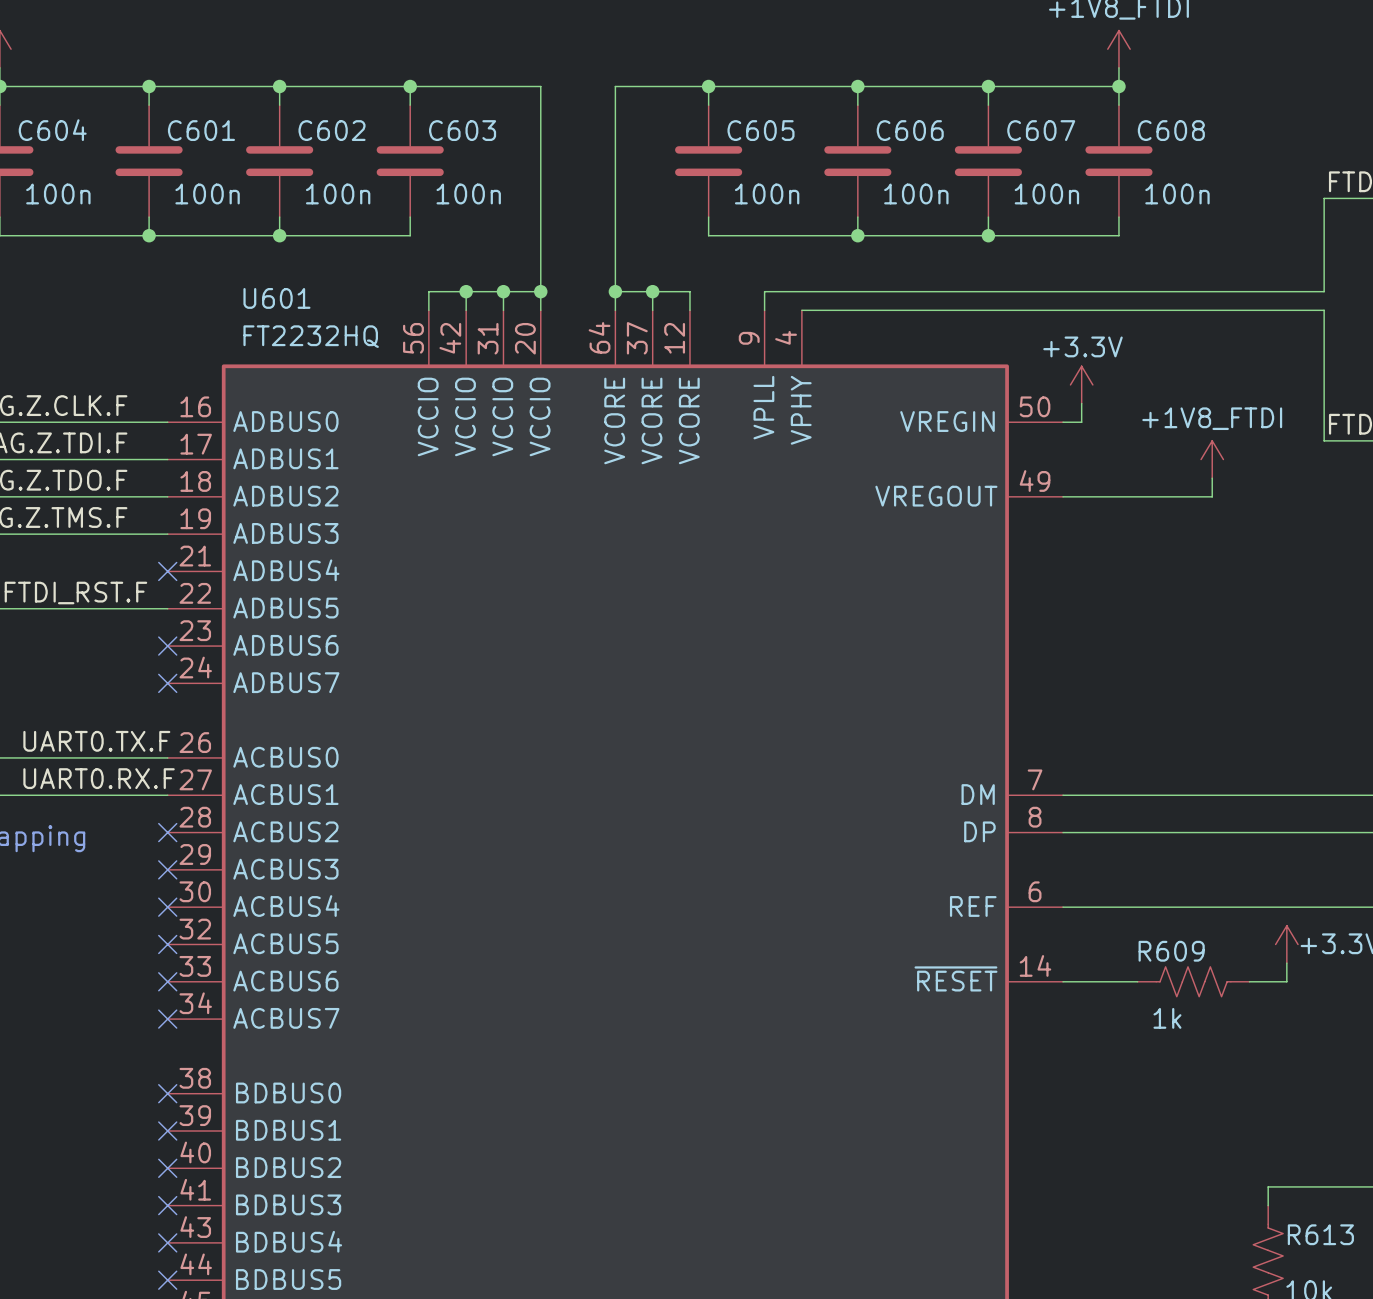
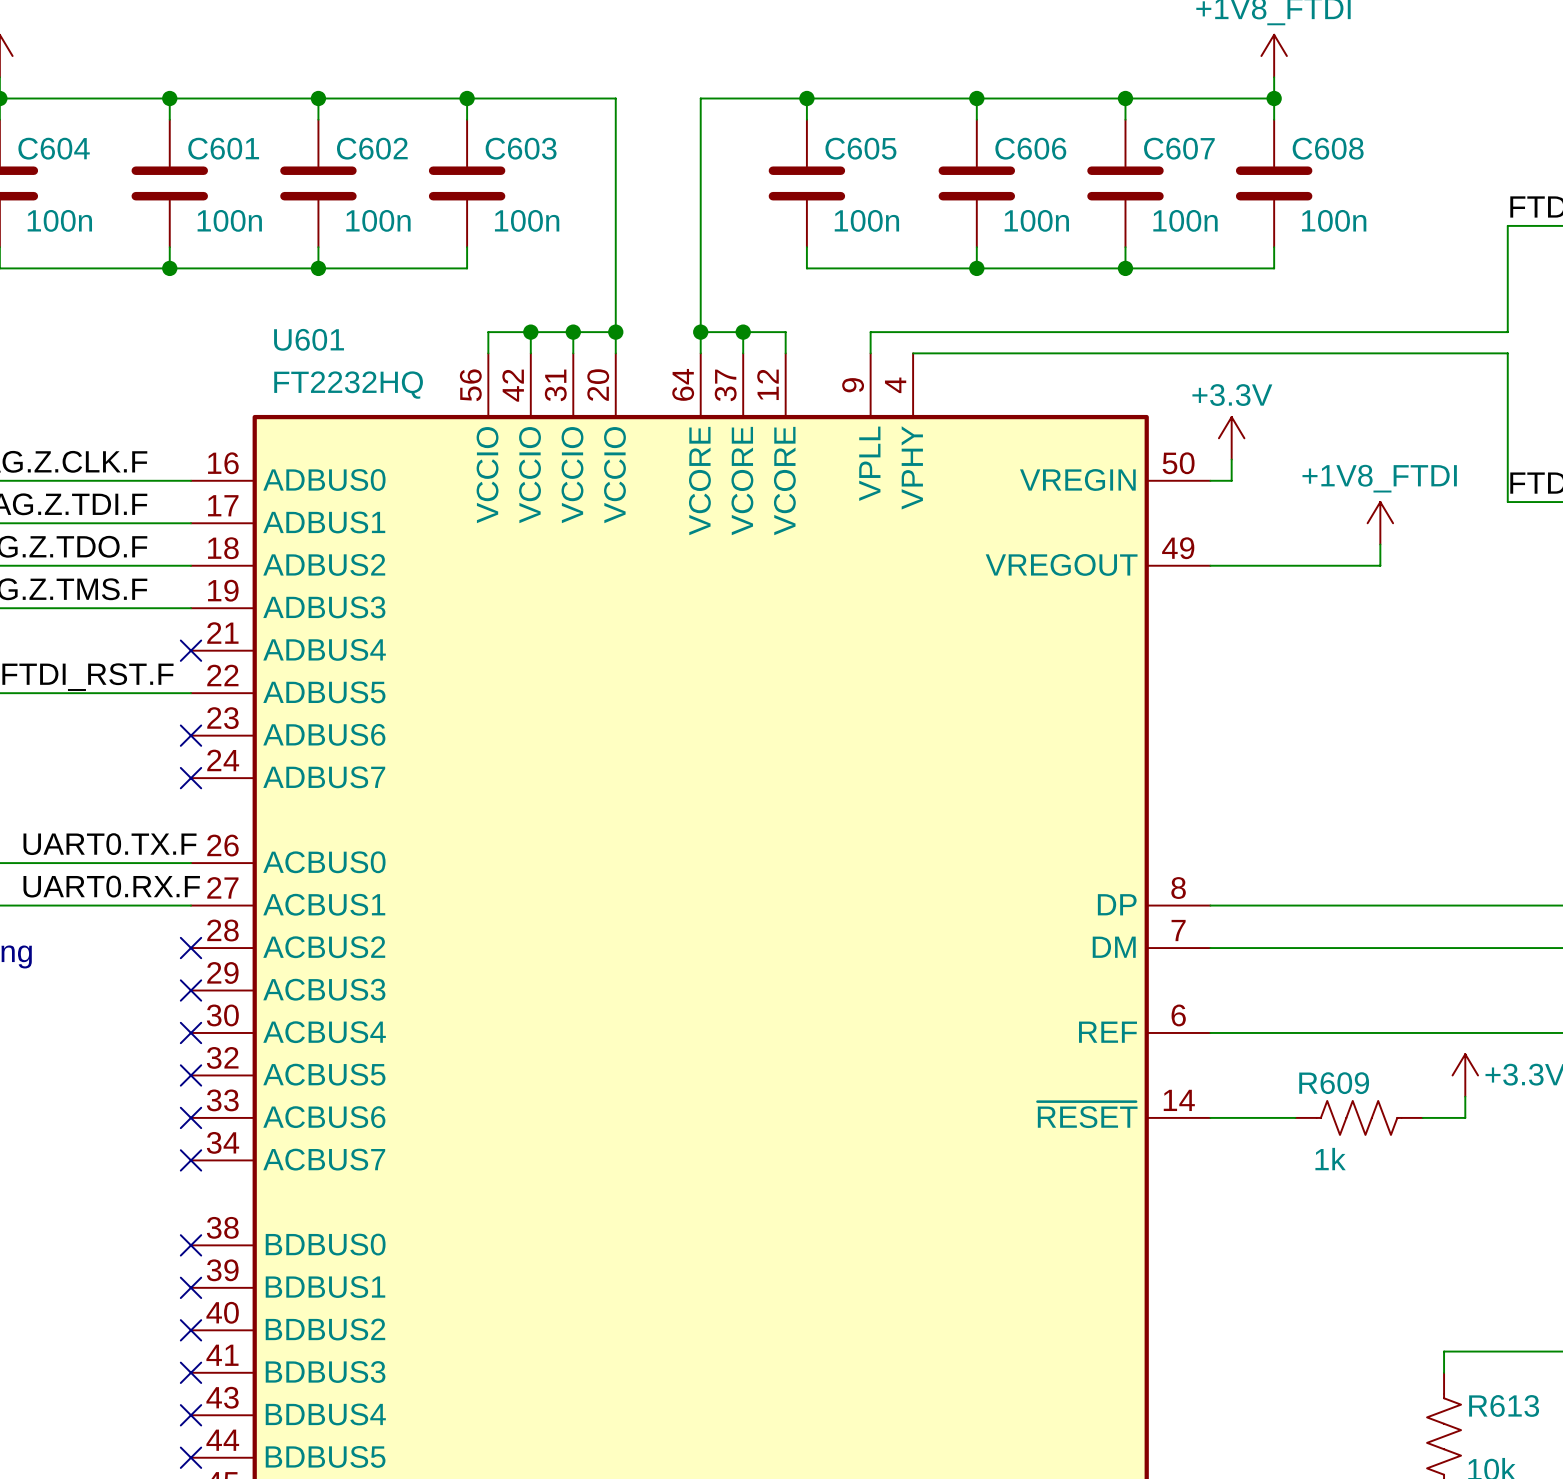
U601 pin number: 7 (1035, 779) -> 8 (1178, 888)
U601 pin name: DM (978, 794) -> DP (1117, 904)
U601 pin number: 8 (1035, 817) -> 7 (1178, 930)
U601 pin name: DP (979, 831) -> DM (1114, 947)

